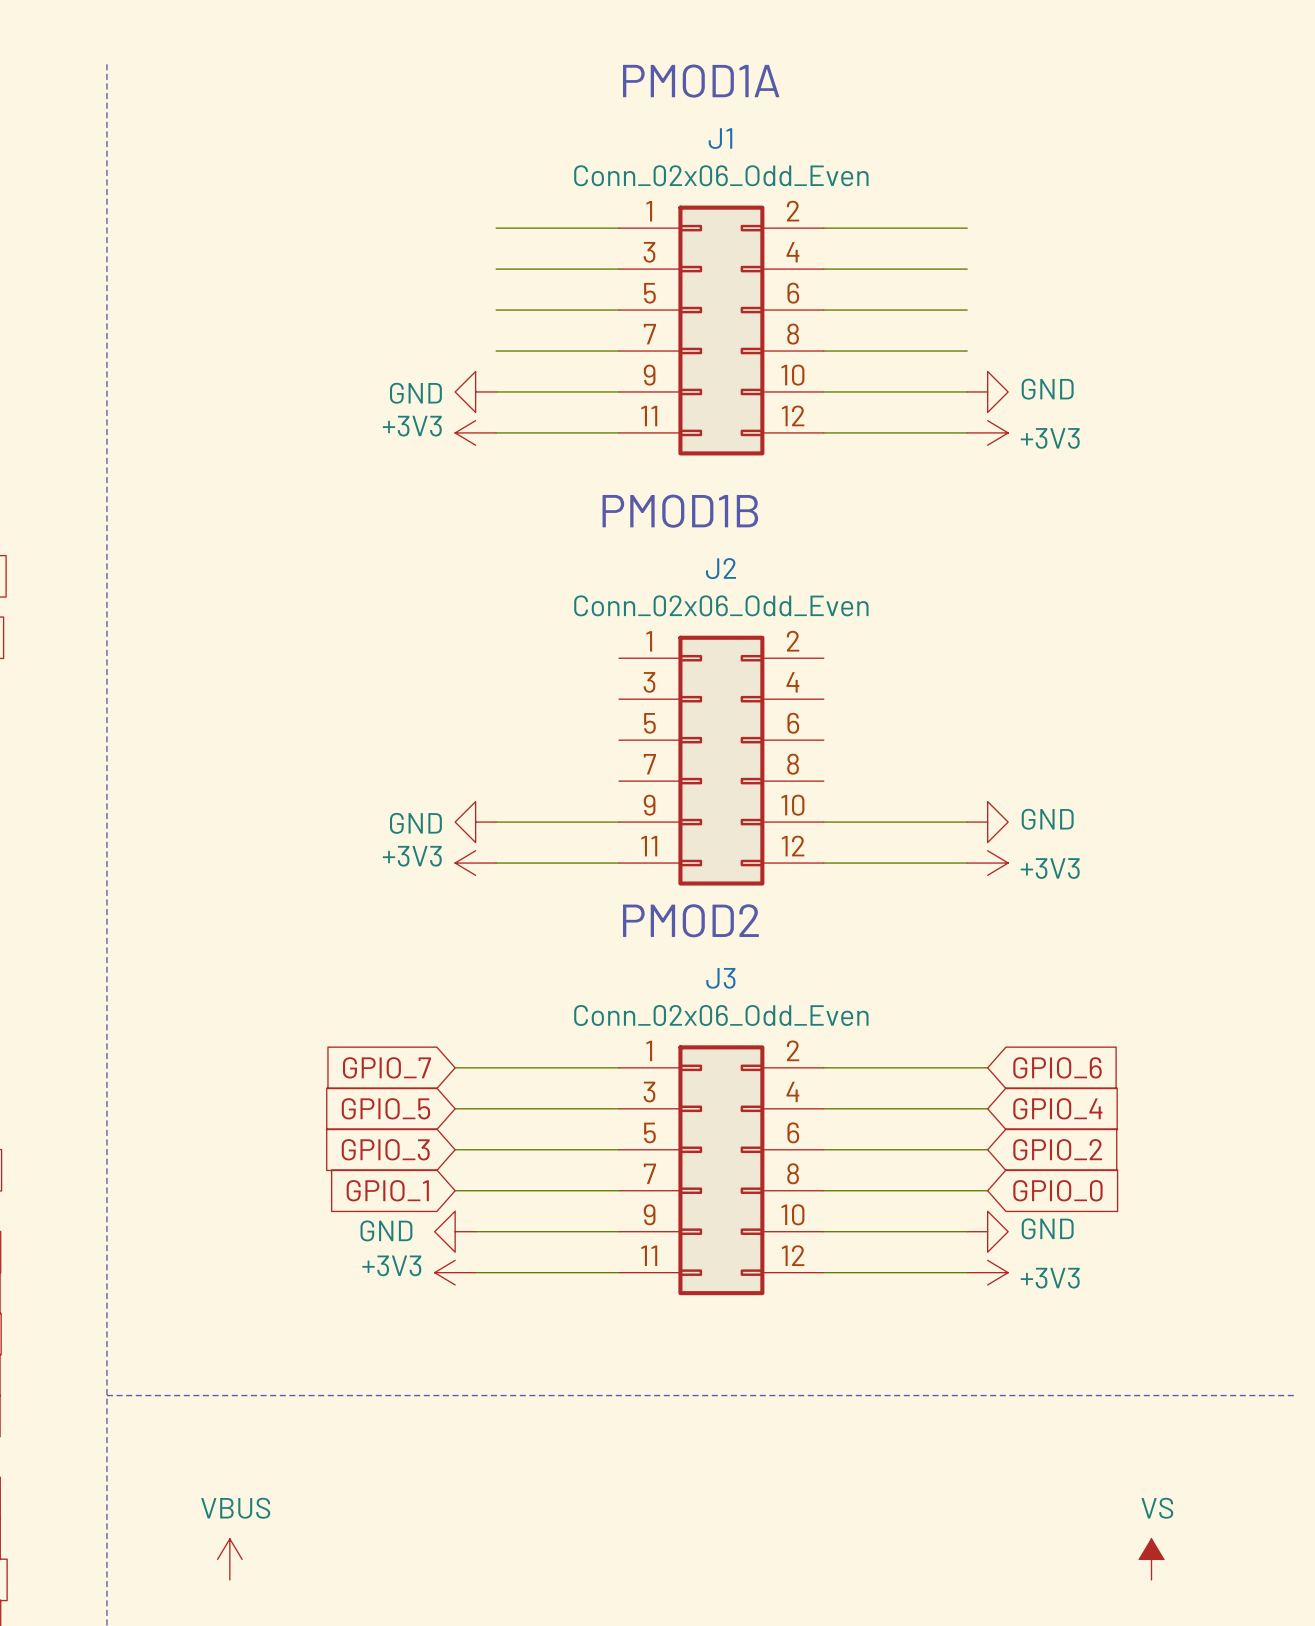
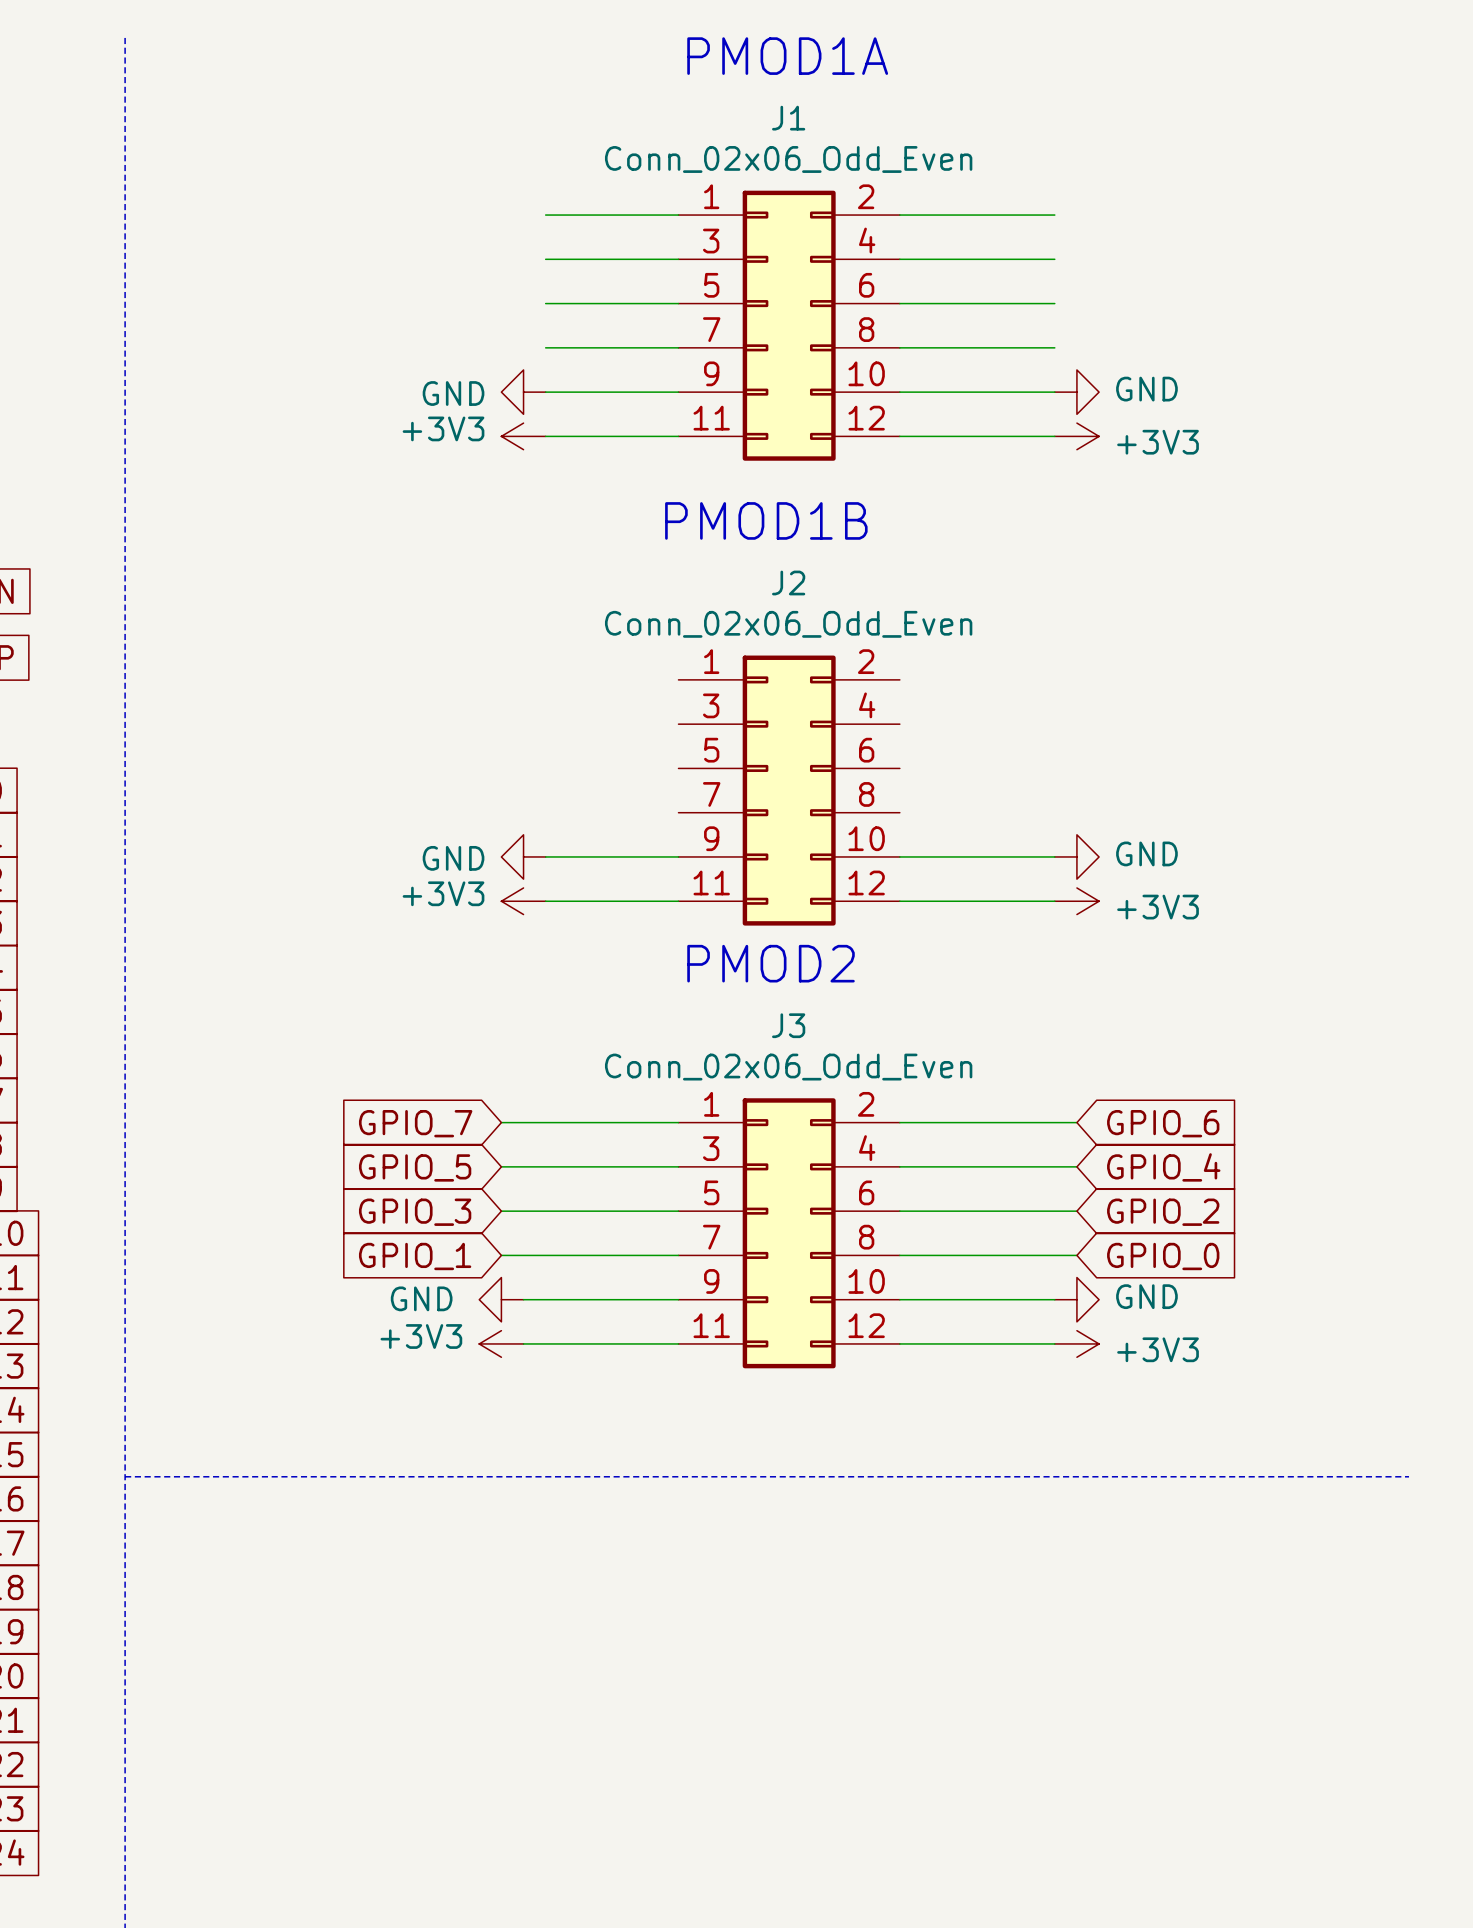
power symbol: VBUS (229, 1559) -> none
power symbol: VS (1151, 1559) -> none

